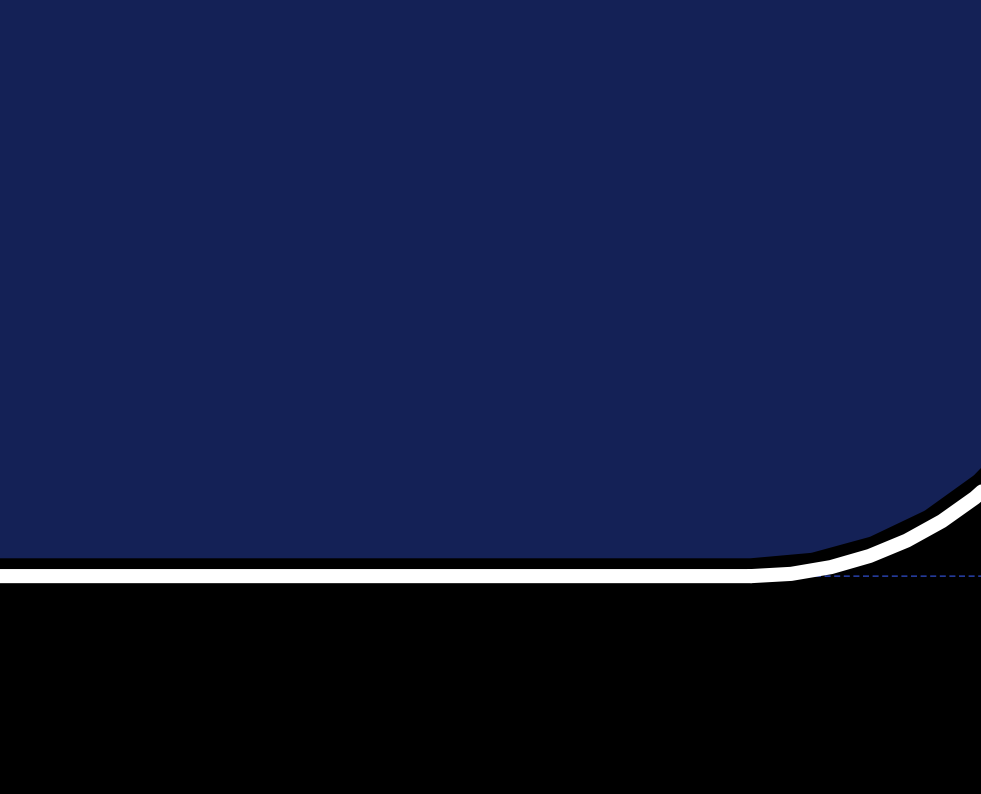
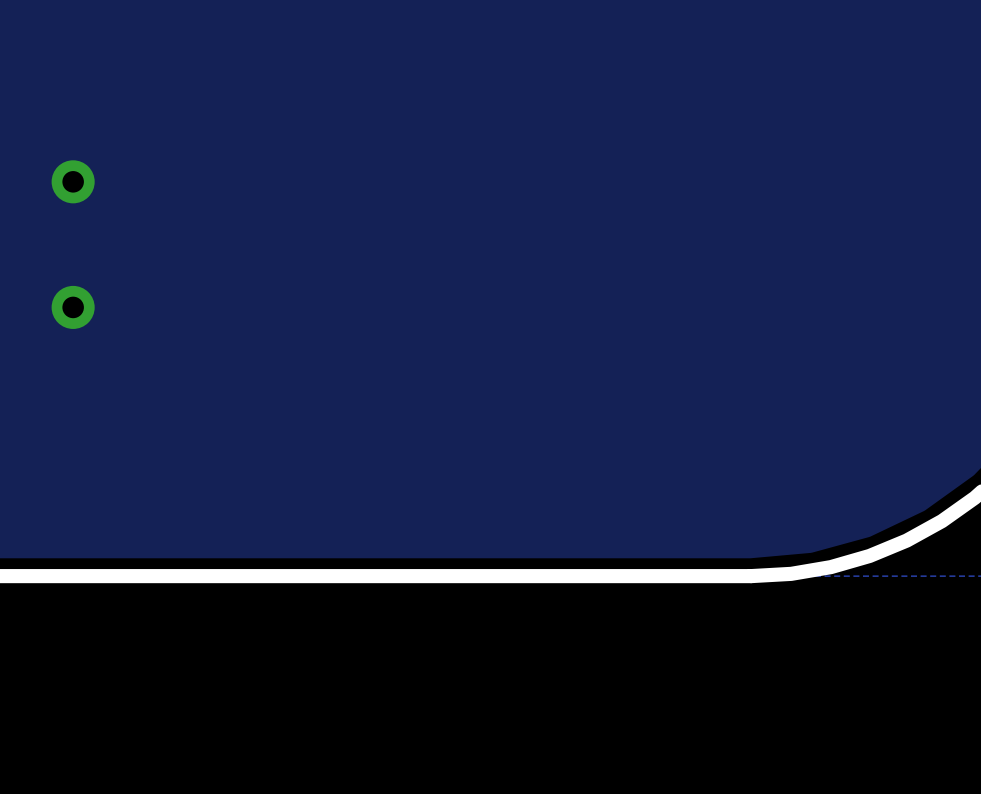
via: none -> (73, 181)
via: none -> (73, 307)

